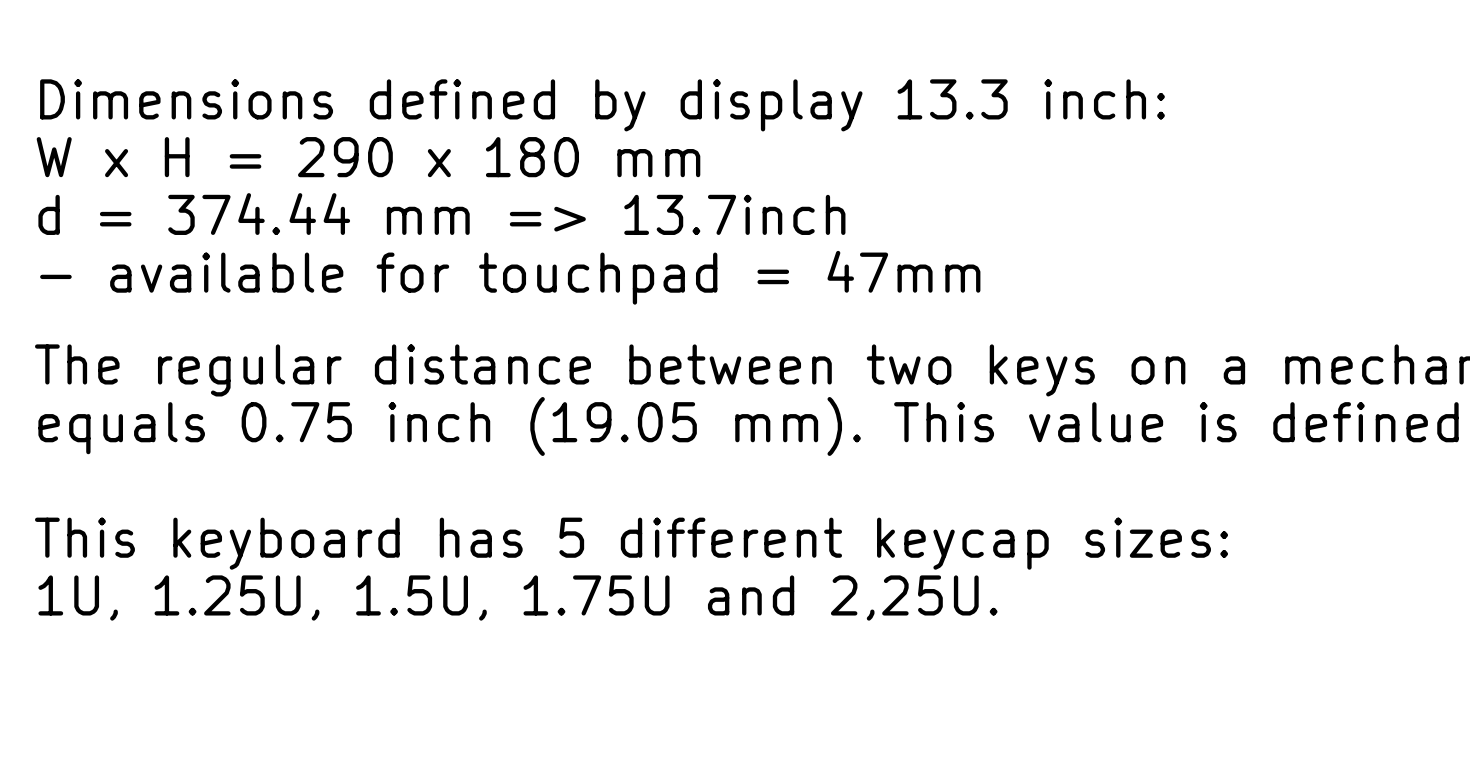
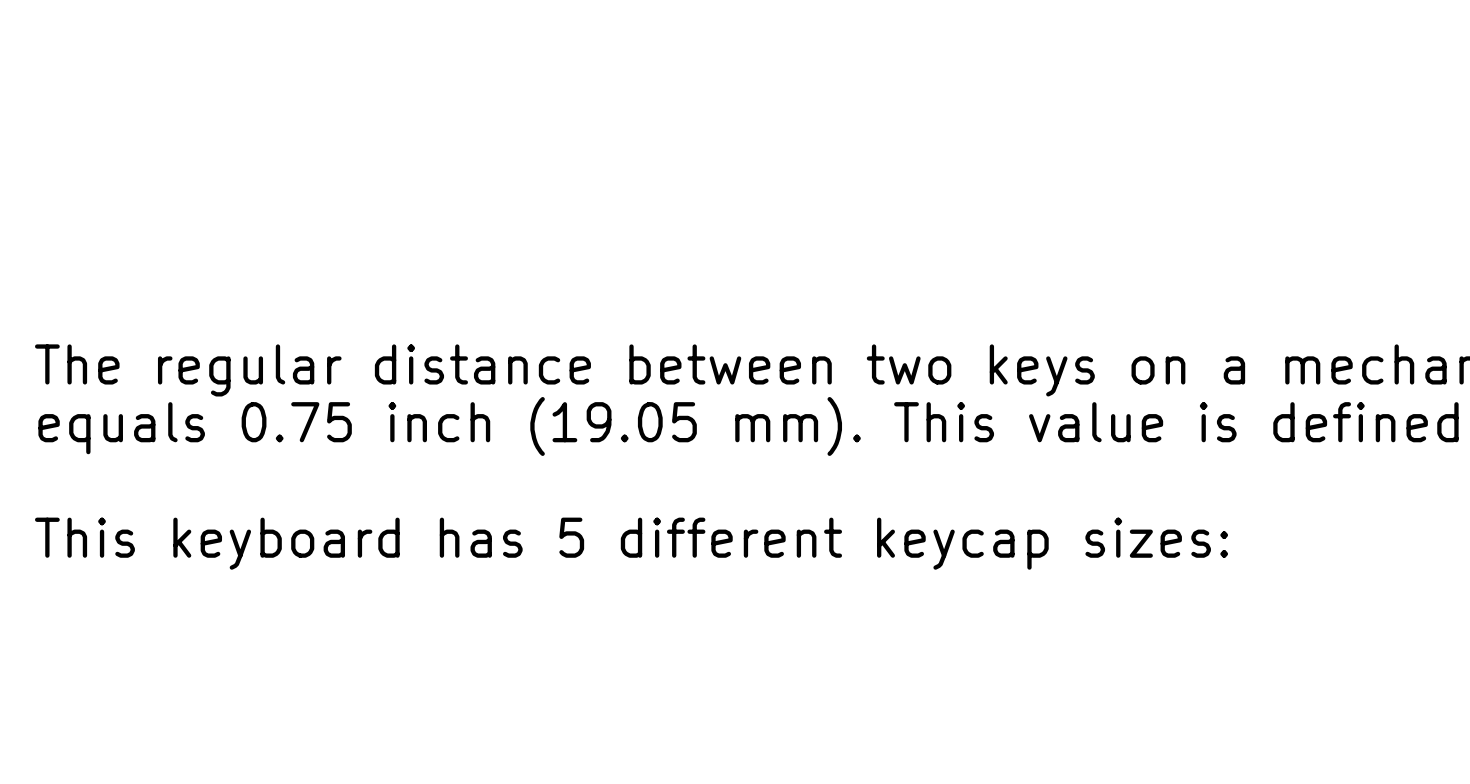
text: Dimensions defined by display 13.3 inch: (602, 105) -> none
text: W x H = 290 x 180 mm (368, 157) -> none
text: d = 374.44 mm => 13.7inch (441, 214) -> none
text: - available for touchpad = 47mm (510, 277) -> none
text: 1U, 1.25U, 1.5U, 1.75U and 2,25U. (517, 598) -> none

